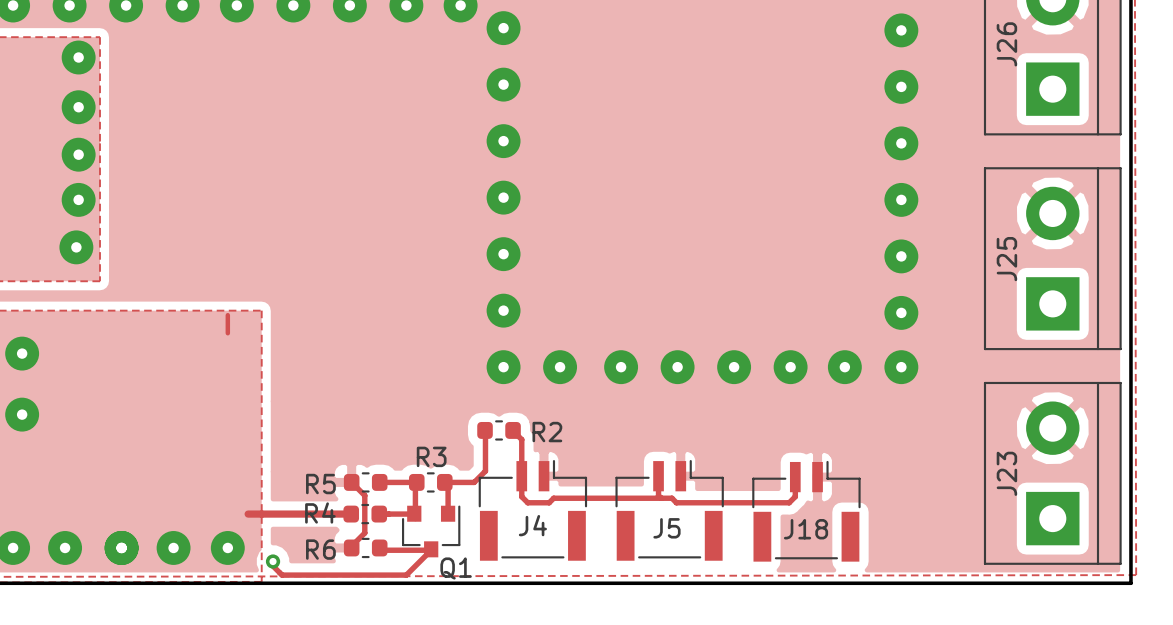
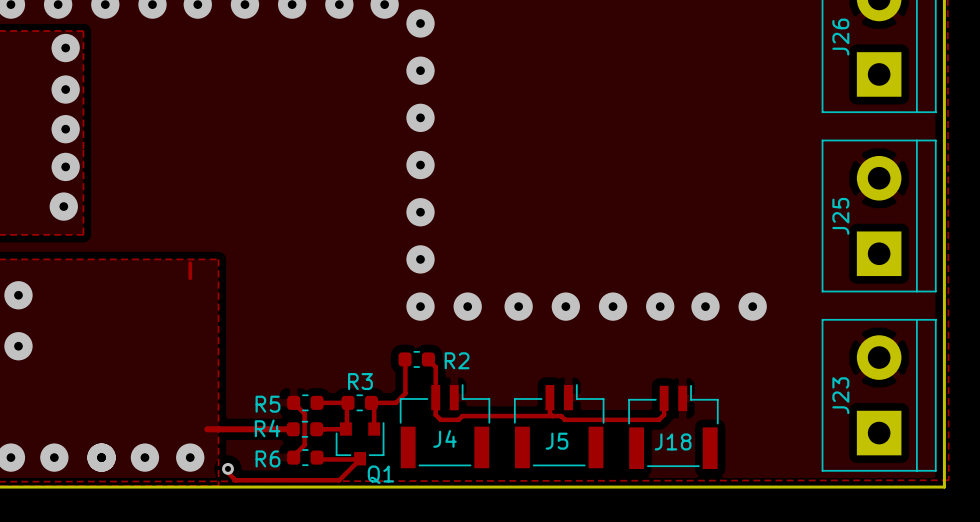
via: (901, 30) -> none
via: (901, 86) -> none
via: (901, 143) -> none
via: (901, 199) -> none
via: (901, 256) -> none
via: (901, 312) -> none

